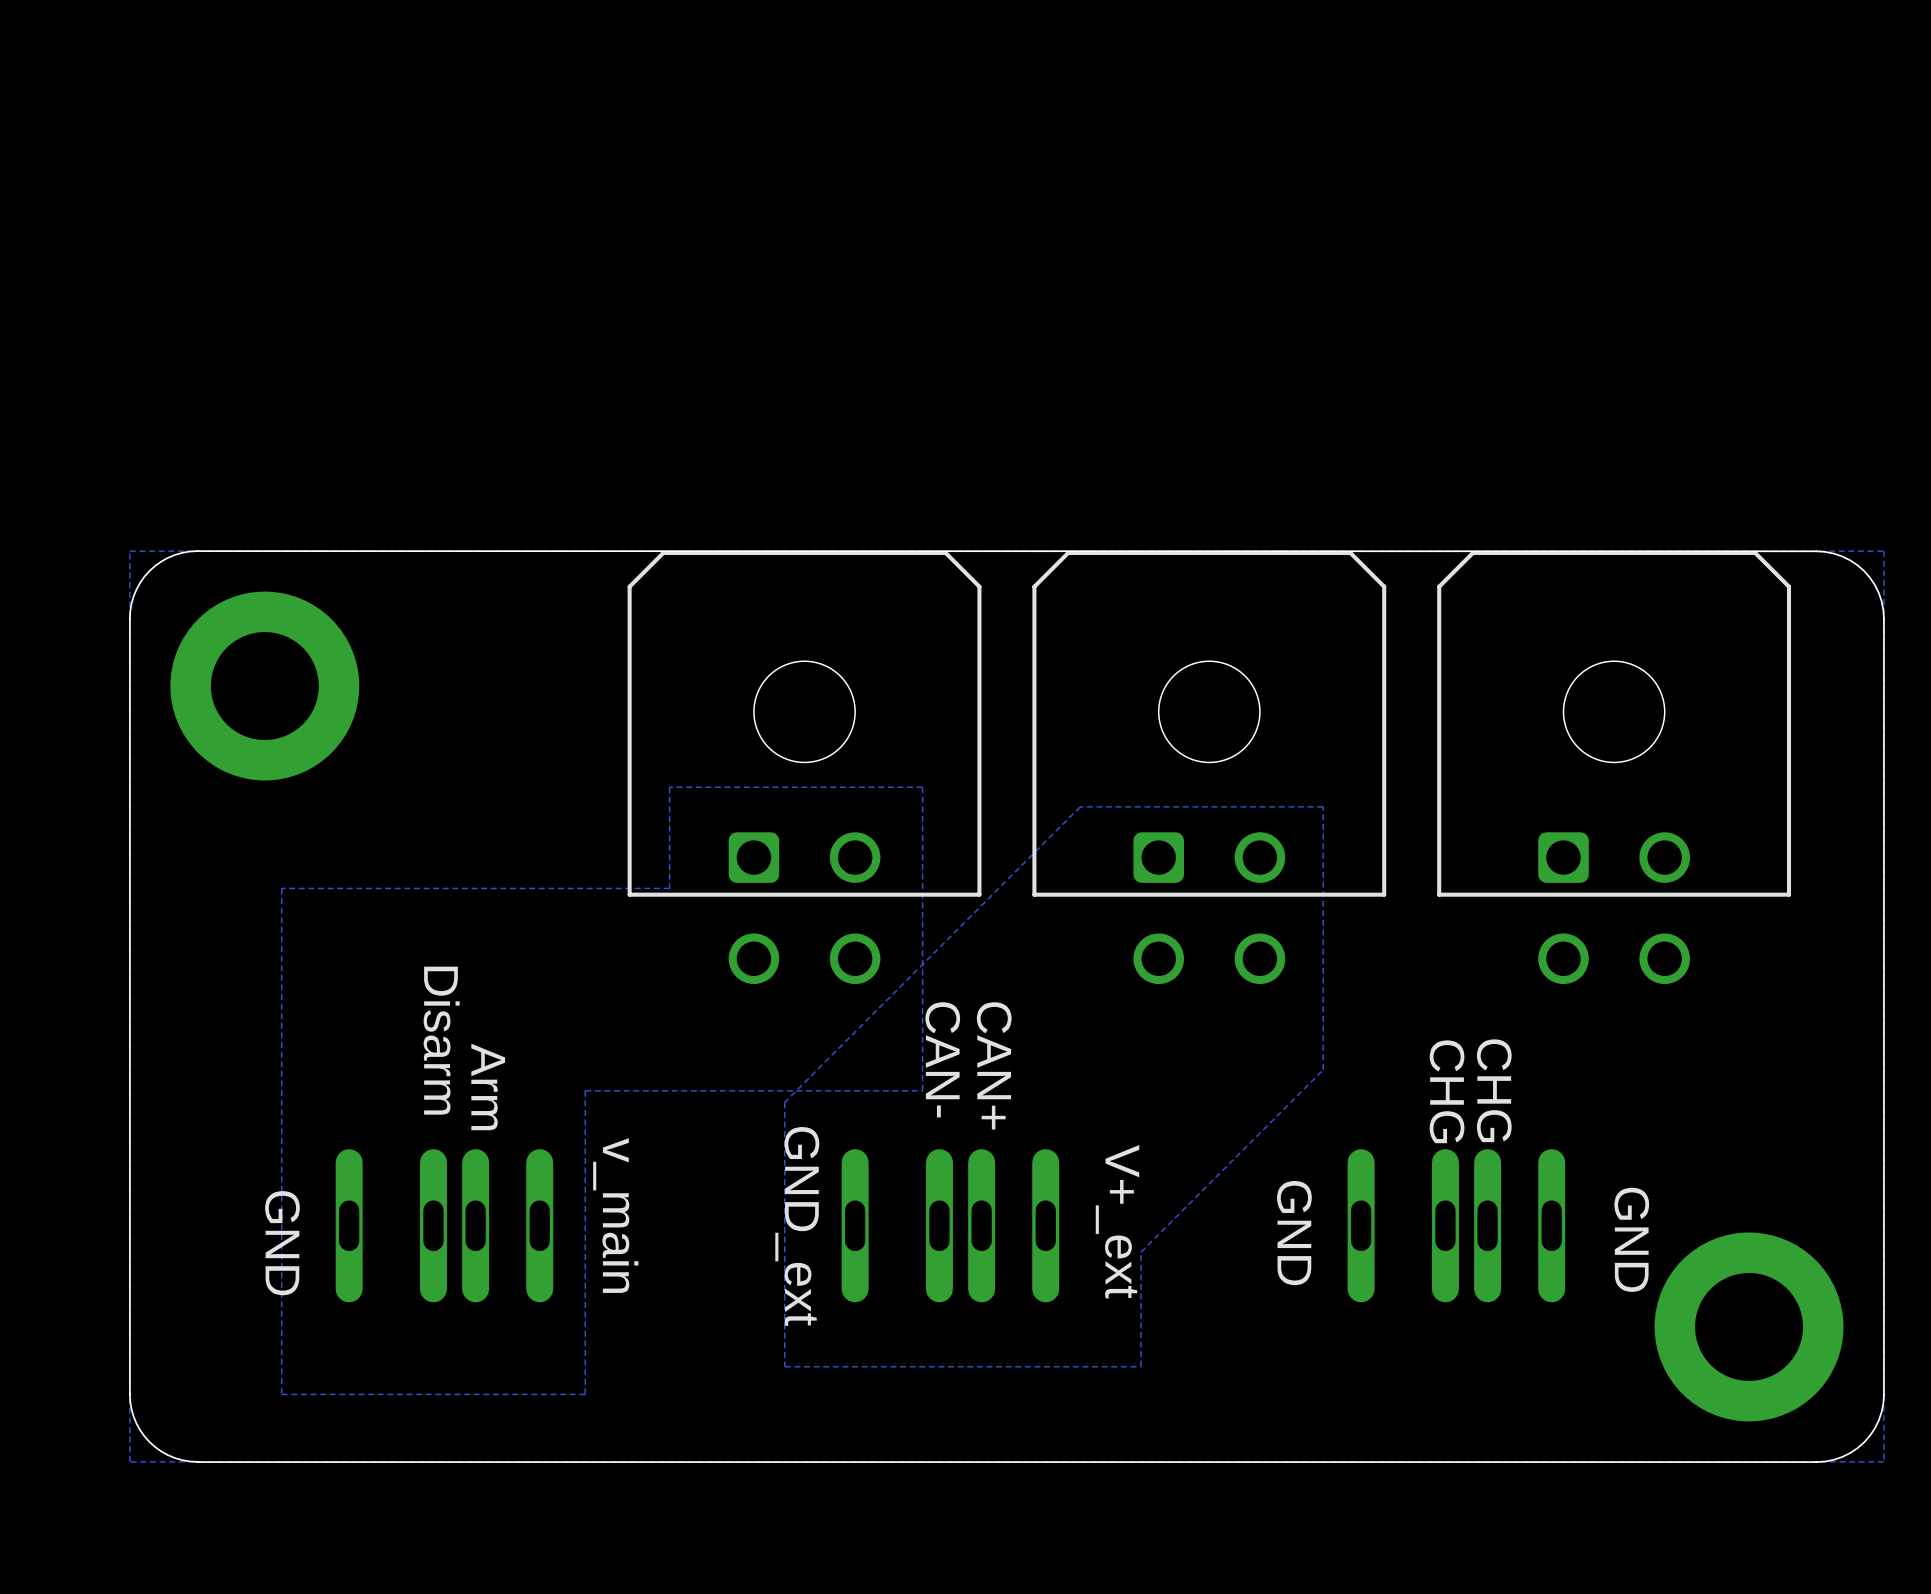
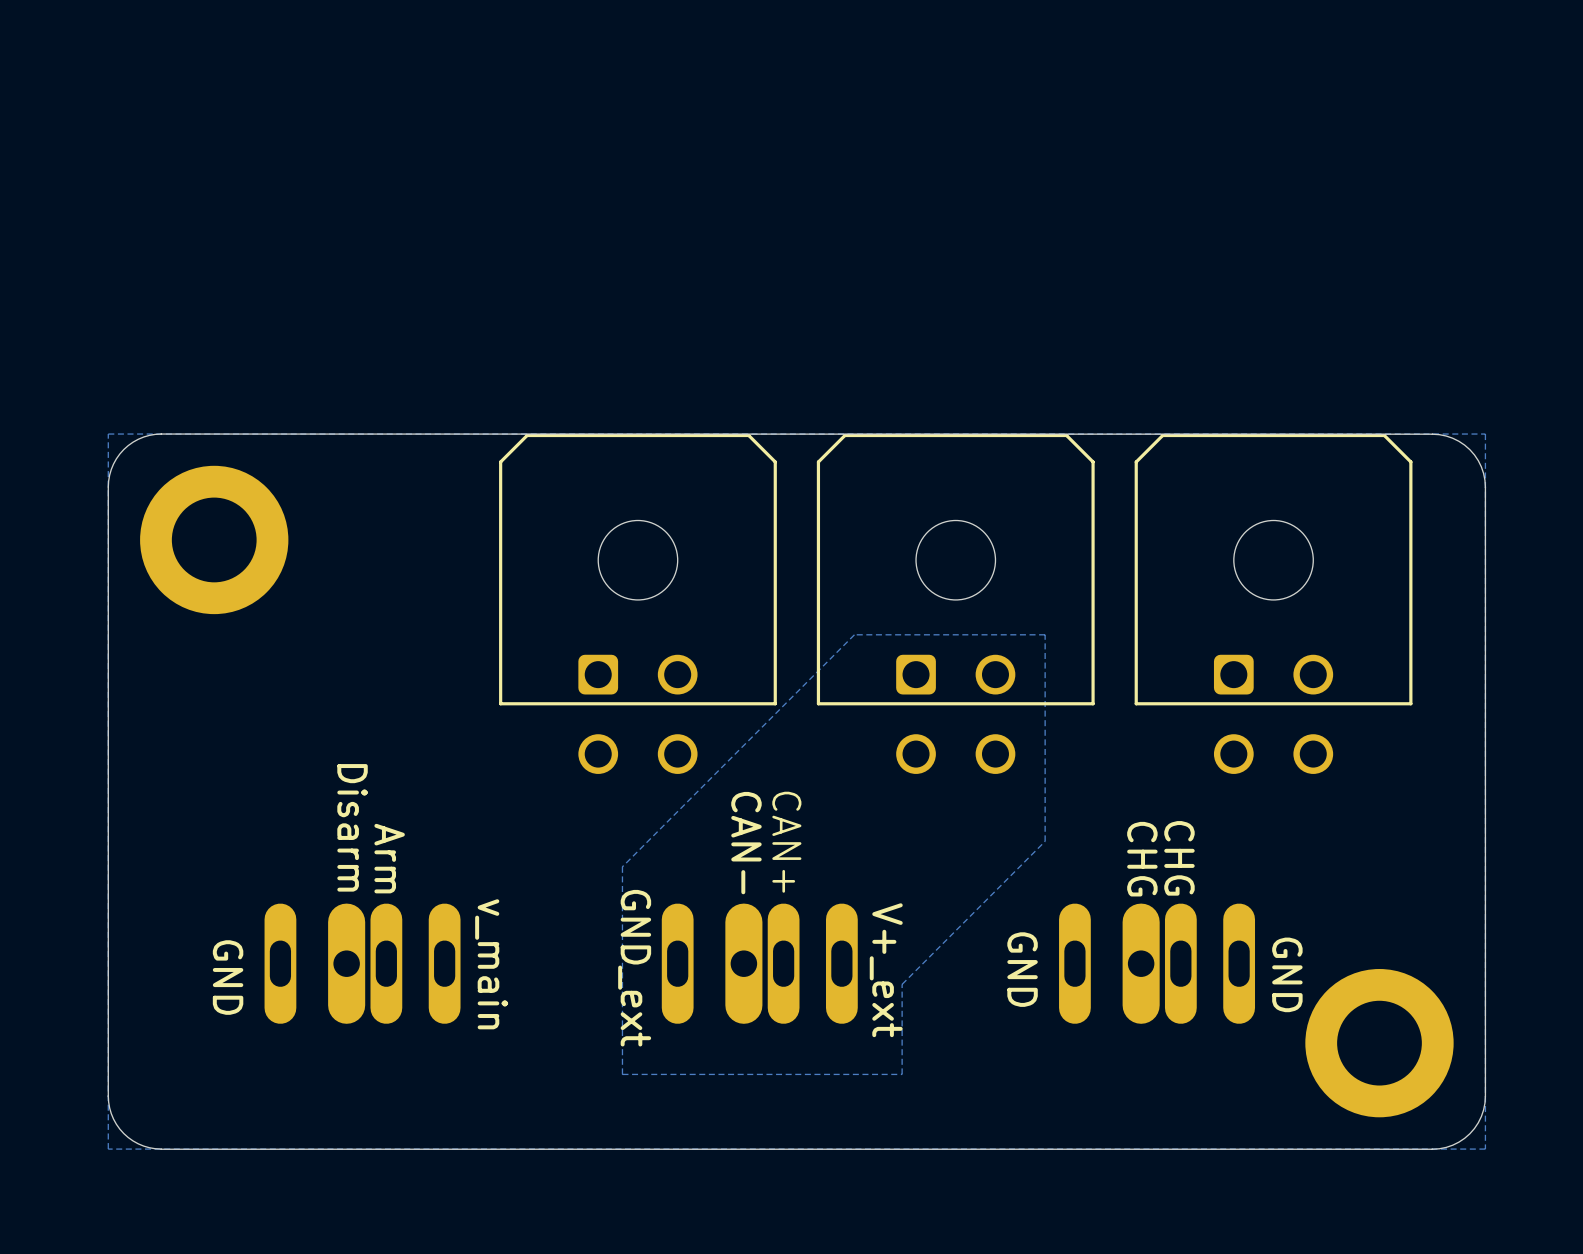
zone outline: (922, 787) (669, 787) (669, 888) (281, 888) (281, 1394) (585, 1394) (585, 1090) (922, 1090) (922, 787) -> none
part footprint: [335, 1149, 554, 1303] -> [264, 903, 461, 1024]
part footprint: [841, 1149, 1060, 1303] -> [661, 903, 858, 1024]
part footprint: [1347, 1149, 1566, 1303] -> [1059, 903, 1256, 1024]

